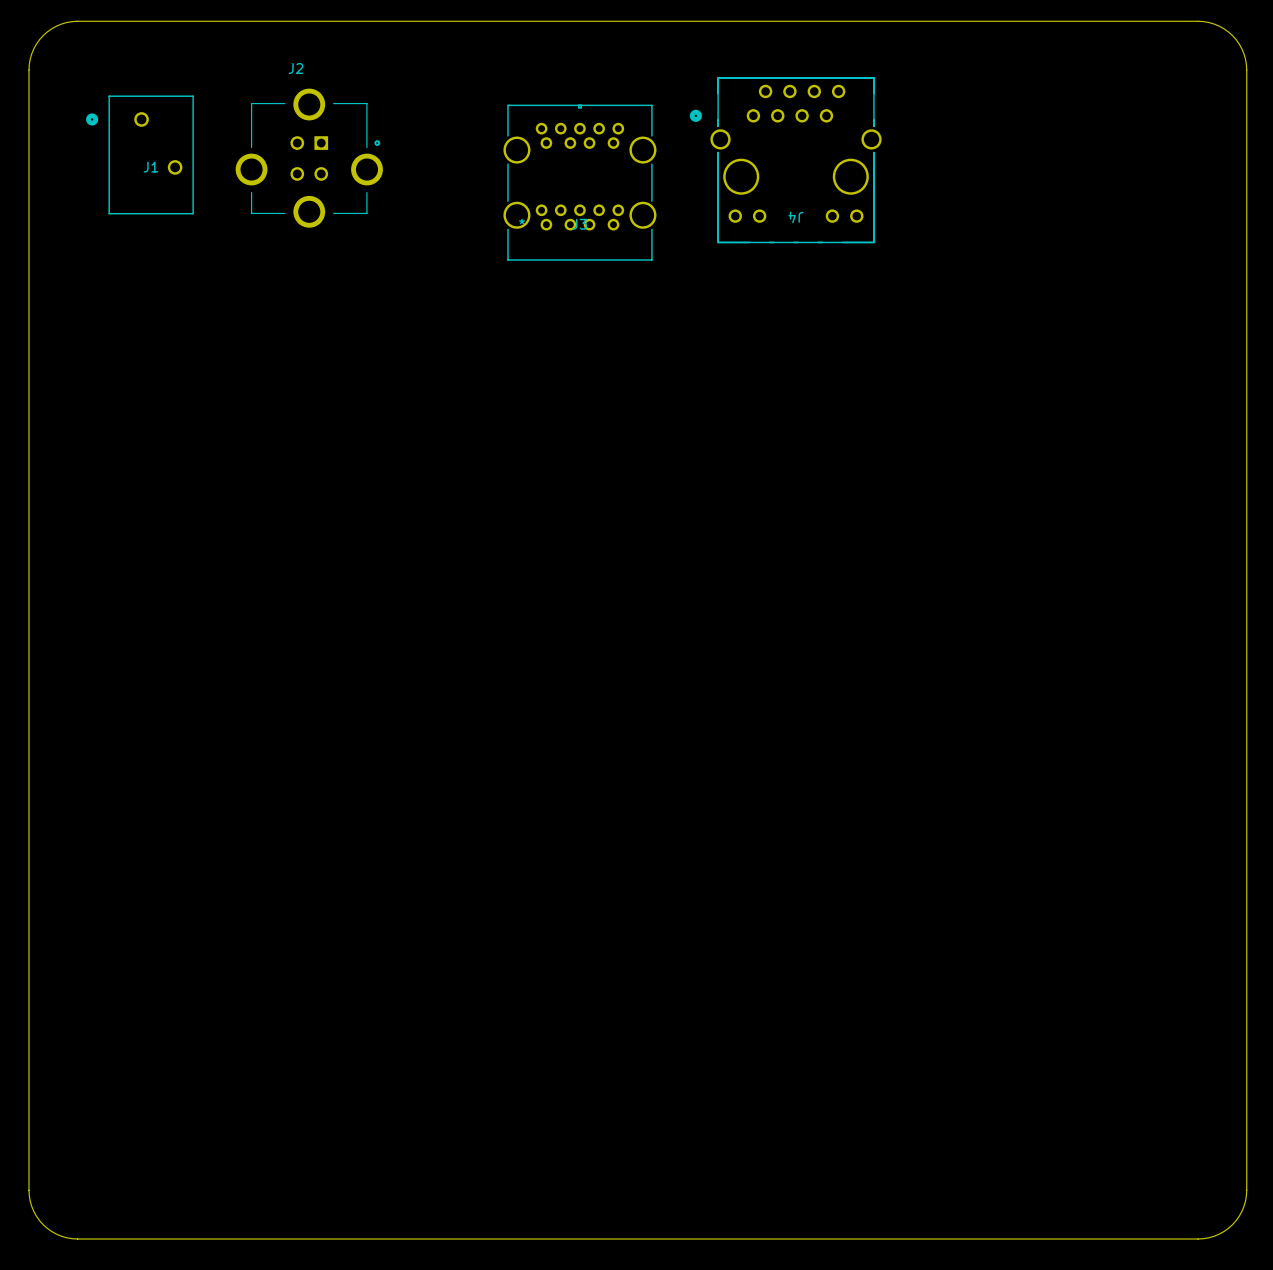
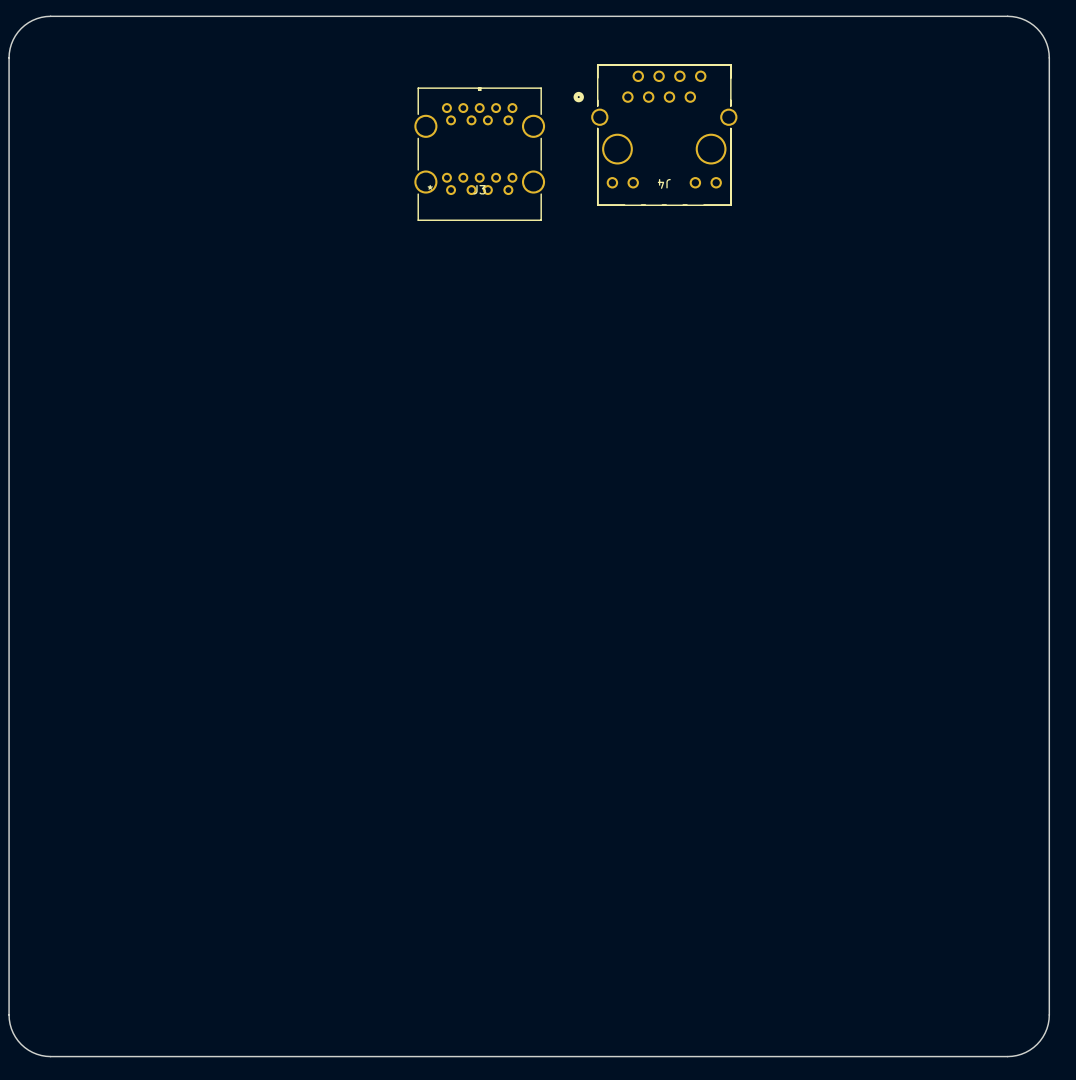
J1: (139, 154) -> none
J2: (309, 158) -> none

